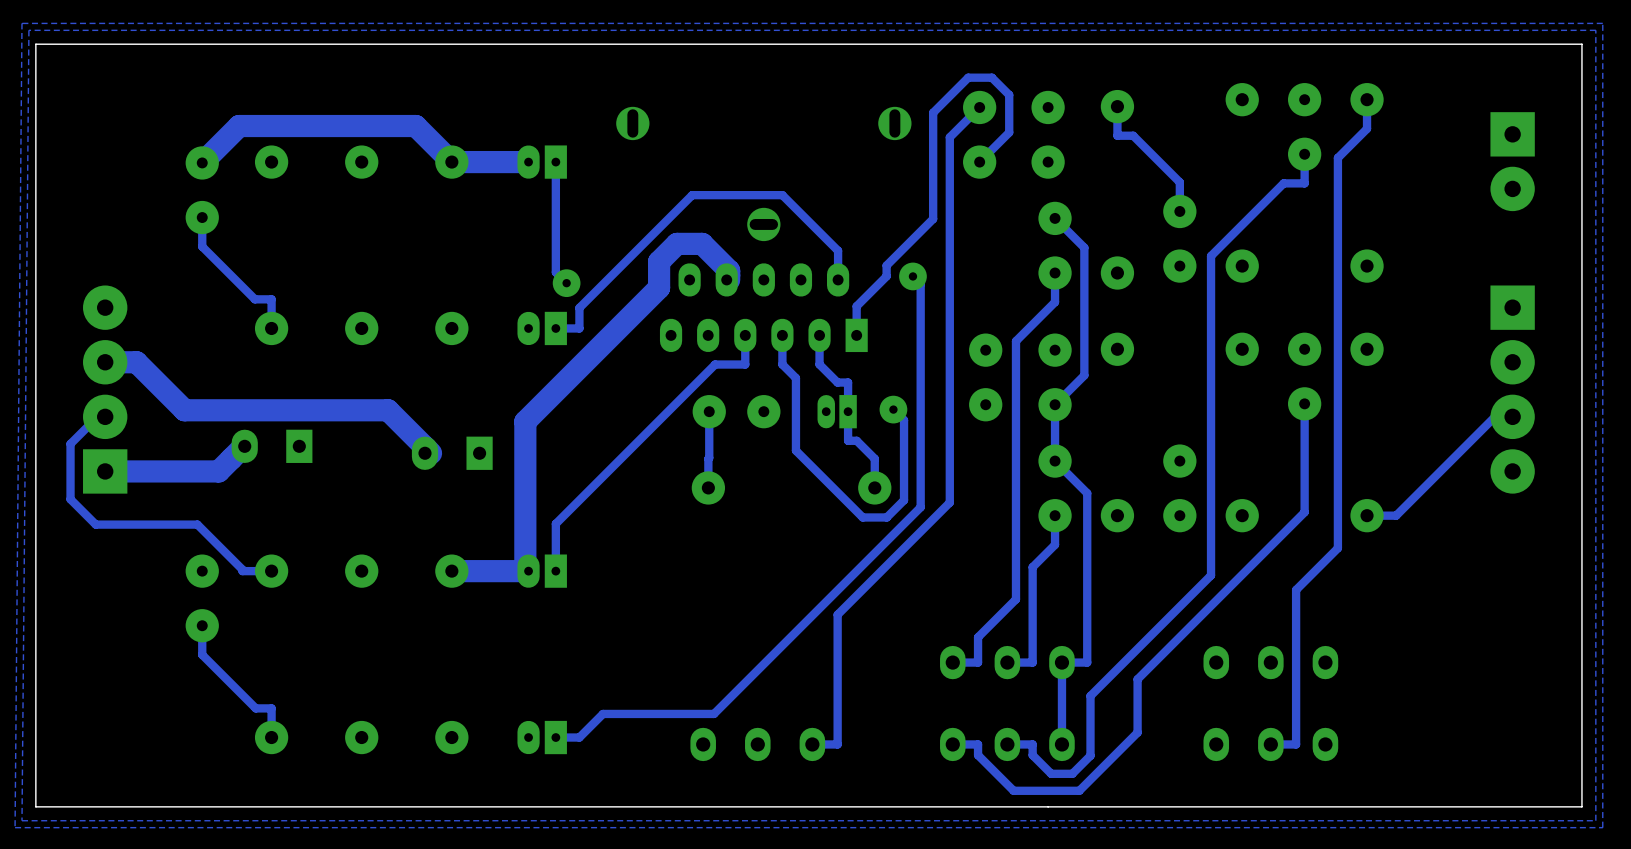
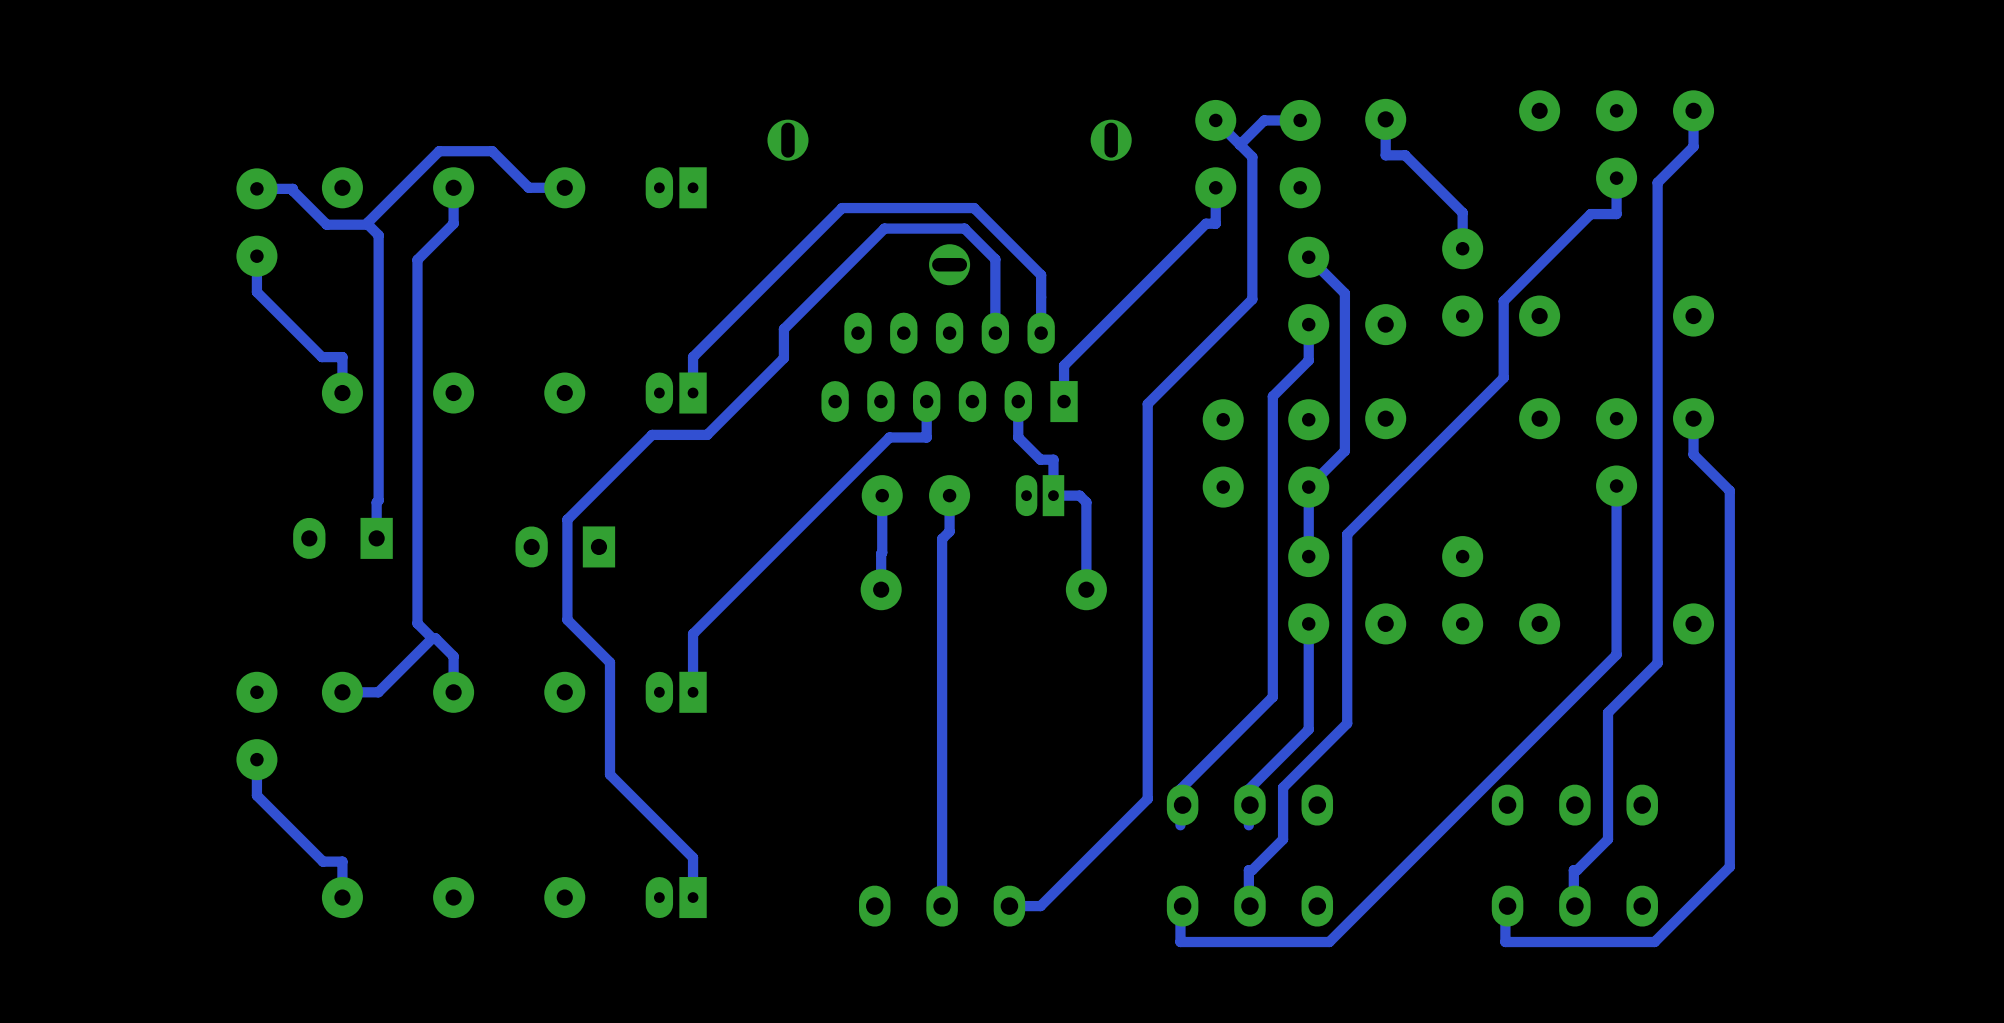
zone outline: (1602, 23) (1602, 827) (15, 827) (21, 23) (1602, 23) -> none
zone outline: (1595, 30) (1595, 820) (21, 820) (28, 30) (1595, 30) -> none
board edge: (1581, 44) (1581, 806) (35, 806) (35, 44) (1581, 44) -> none
track: (979, 107) (949, 137) (949, 502) (837, 614) (837, 744) -> (1215, 120) (1252, 157) (1252, 299) (1147, 403) (1147, 798) (1040, 906)
track: none -> (1300, 120) (1264, 120) (1240, 144)
part: (1512, 161) -> none
track: none -> (453, 187) (453, 223) (417, 259) (417, 623) (432, 638)
track: none -> (564, 187) (528, 187) (492, 151) (439, 151) (368, 222) (368, 224)
track: (528, 162) (451, 162) (415, 126) (239, 126) (202, 162) -> (368, 224) (326, 224) (292, 188) (256, 188)
track: (555, 162) (555, 272) (566, 283) -> none
track: (979, 162) (1009, 132) (1009, 94) (991, 77) (968, 77) (933, 112) (933, 218) (886, 265) (886, 276) -> (1215, 187) (1215, 223) (1205, 223) (1101, 328)
track: none -> (368, 224) (378, 235) (378, 500) (376, 502) (376, 538)
track: (711, 195) (692, 195) (579, 307) (579, 328) (555, 328) -> (1041, 297) (1041, 275) (974, 208) (842, 208) (693, 357) (693, 393)
track: (776, 195) (782, 195) (838, 250) -> (964, 228) (995, 259) (995, 333)
track: (1213, 253) (1211, 256) (1211, 575) (1090, 695) (1090, 755) (1072, 773) (1051, 773) (1032, 755) (1032, 744) (1007, 744) -> (1503, 301) (1503, 377) (1347, 534) (1347, 723) (1283, 787) (1283, 839) (1252, 870) (1248, 870) (1248, 906)
track: (912, 276) (920, 284) (920, 507) (714, 713) (603, 713) (579, 737) (555, 737) -> (884, 228) (783, 329) (783, 358) (707, 434) (652, 434) (567, 519) (567, 619) (610, 662) (610, 774) (693, 857) (693, 897)
via: (912, 276) -> none
track: (729, 279) (729, 270) (702, 243) (676, 243) (659, 261) (659, 287) (525, 421) (525, 571) -> none
via: (566, 283) -> none
track: (1025, 331) (1016, 341) (1016, 599) (978, 637) (978, 662) (952, 662) -> (1272, 396) (1272, 697) (1180, 789) (1180, 825)
track: (782, 335) (782, 364) (795, 378) (795, 450) (862, 517) (886, 517) (904, 500) (904, 420) (893, 409) -> none
track: none -> (1693, 418) (1693, 454) (1729, 490) (1729, 866) (1654, 942) (1505, 942) (1505, 906)
track: (105, 362) (136, 362) (184, 410) (388, 410) (431, 453) -> none
part: (105, 389) -> none
part: (1512, 389) -> none
via: (893, 409) -> none
track: none -> (949, 495) (949, 531) (942, 539) (942, 906)
track: (848, 411) (848, 440) (856, 440) (874, 458) -> (1053, 495) (1079, 495) (1086, 502) (1086, 553)
track: (105, 416) (97, 416) (70, 443) (70, 499) (95, 524) (197, 524) (242, 571) (271, 571) -> (432, 638) (378, 692) (342, 692)
track: (1512, 416) (1494, 416) (1396, 515) (1367, 515) -> none
track: (243, 446) (218, 471) (105, 471) -> none
track: (1055, 461) (1087, 493) (1087, 662) (1061, 662) (1061, 744) -> none
track: (1304, 512) (1137, 679) (1137, 732) (1079, 790) (1013, 790) (978, 755) (978, 744) (952, 744) -> (1616, 619) (1616, 654) (1329, 942) (1180, 942) (1180, 906)
track: none -> (432, 638) (435, 638) (453, 656) (453, 692)
track: (1055, 544) (1032, 567) (1032, 662) (1007, 662) -> (1308, 659) (1308, 729) (1248, 789) (1248, 825)
track: (1337, 547) (1296, 590) (1296, 744) (1270, 744) -> (1657, 663) (1608, 712) (1608, 839) (1577, 870) (1573, 870) (1573, 906)
track: (525, 571) (451, 571) -> none

